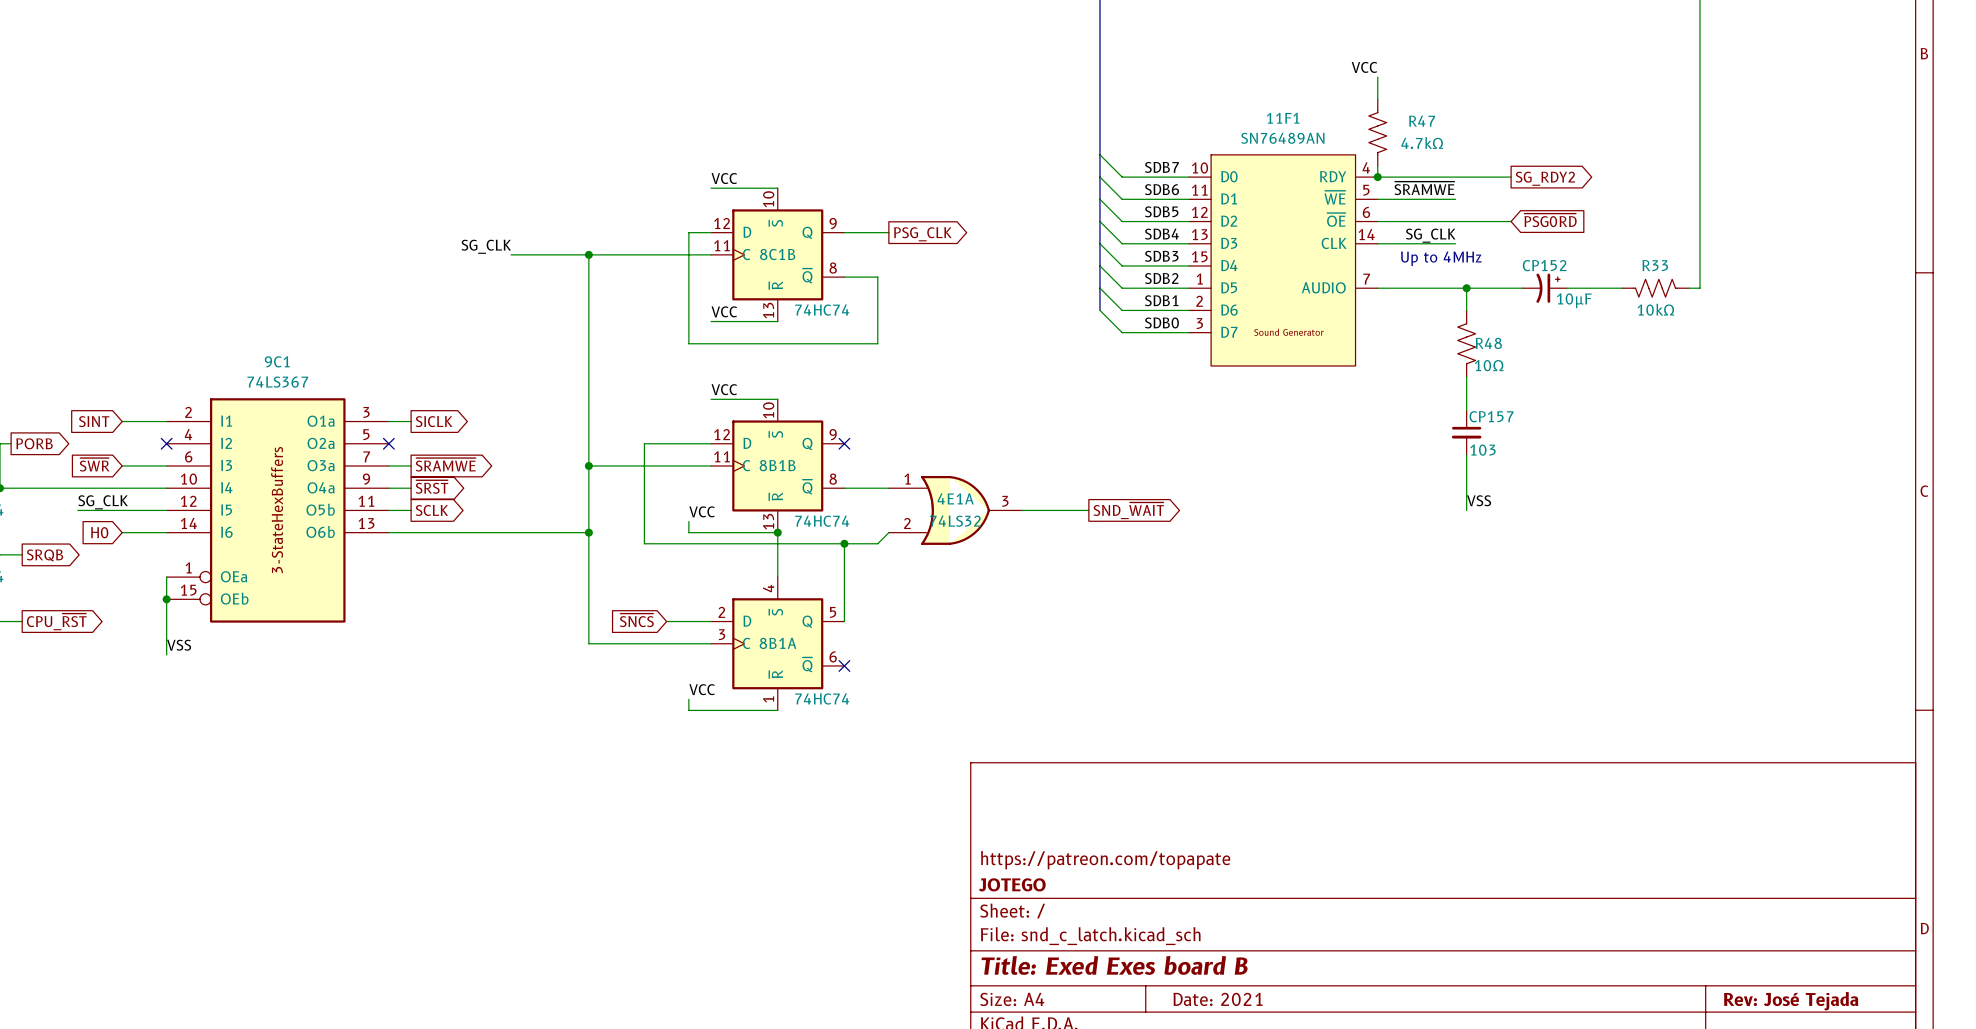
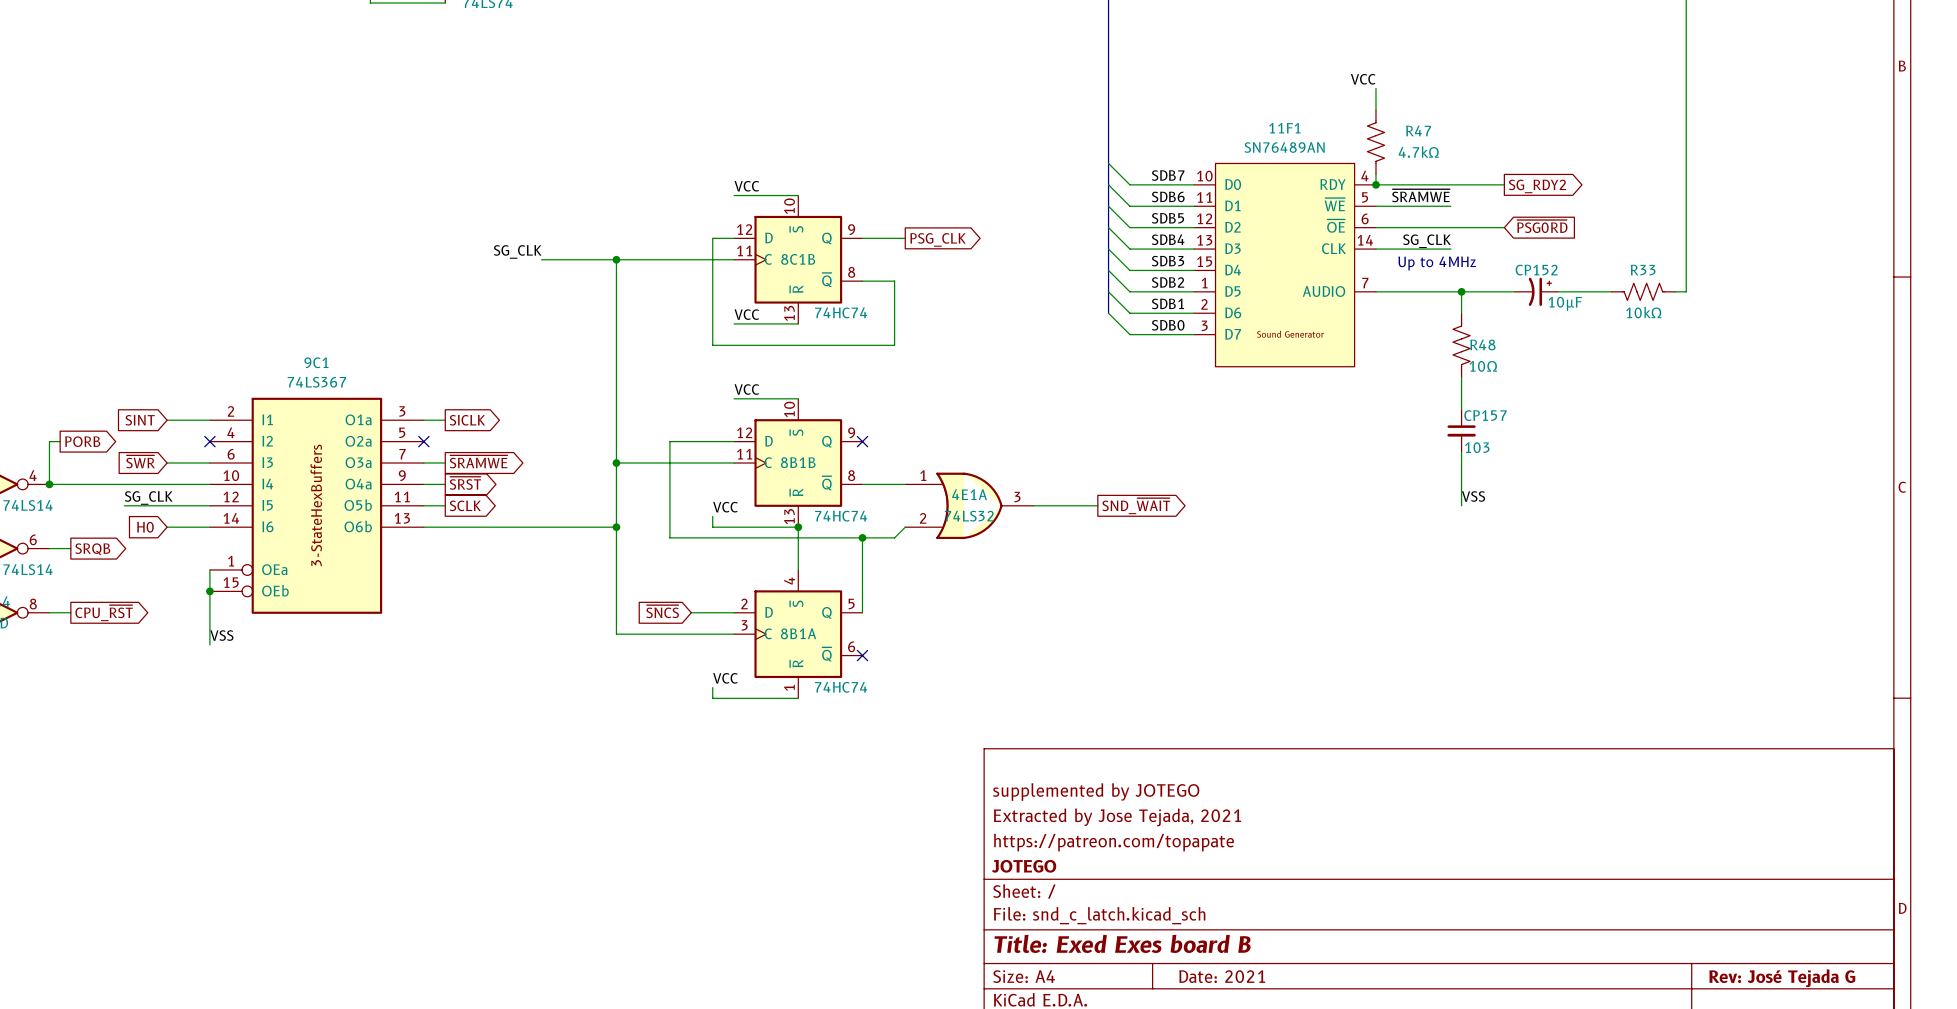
title block: none -> supplemented by JOTEGO (1096, 792)
title block: none -> Extracted by Jose Tejada, 2021 (1117, 817)
title block: Rev: José Tejada (1791, 1001) -> Rev: José Tejada G (1782, 978)

